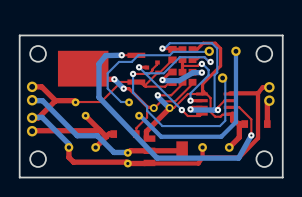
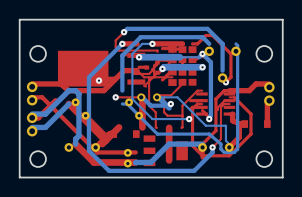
top track: none -> (124, 32) (115, 40) (115, 47) (119, 50) (157, 51)
bottom track: none -> (124, 32) (127, 28) (207, 28) (222, 43) (222, 70)
via: none -> (124, 32)
board edge: (282, 35) (19, 35) -> (282, 35) (282, 19) (19, 19) (19, 35)
bottom track: none -> (122, 43) (88, 77) (88, 150) (109, 170) (194, 170) (212, 152) (212, 147)
via: none -> (122, 43)
top track: none -> (137, 43) (122, 43)
top track: none -> (152, 43) (182, 44)
bottom track: none -> (152, 43) (142, 43) (132, 53) (132, 99) (152, 119) (189, 119)
via: none -> (152, 43)
bottom track: none -> (209, 43) (202, 37) (140, 37) (122, 55) (122, 90)
bottom track: none -> (235, 43) (237, 45) (237, 149) (234, 152) (224, 152) (220, 149) (220, 144) (209, 134) (157, 134) (127, 104) (122, 104)
top track: none -> (192, 44) (197, 43) (205, 35) (212, 35) (230, 53) (230, 77) (225, 82)
bottom track: (162, 48) (169, 43) (211, 43) (217, 48) (217, 72) (214, 75) (214, 110) -> none
via: (162, 48) -> none
top track: (192, 49) (197, 49) (203, 43) (215, 43) (220, 48) (220, 65) (202, 83) (202, 93) (187, 93) (173, 108) (169, 108) (146, 131) (146, 138) (149, 138) -> none
bottom track: (209, 51) (173, 51) (169, 55) (138, 55) (131, 61) (119, 61) (107, 73) (107, 88) (121, 102) (129, 102) -> none
bottom track: (235, 51) (235, 122) (221, 136) (161, 136) (139, 115) -> none
via: none -> (202, 53)
top track: none -> (172, 54) (167, 60) (159, 60) (154, 65) (154, 77)
bottom track: (121, 55) (105, 55) (98, 63) (98, 97) (157, 158) (238, 158) (251, 135) -> none
via: (121, 55) -> none
via: none -> (139, 57)
bottom track: (179, 57) (163, 73) (145, 73) -> (179, 57) (139, 57)
bottom track: (199, 57) (204, 57) (210, 61) -> (199, 57) (202, 53) (210, 62) (210, 115) (209, 119)
via: (210, 61) -> none
top track: (201, 63) (197, 65) (182, 65) -> none
bottom track: (201, 63) (208, 69) (208, 75) (190, 93) (190, 100) -> none
via: (201, 63) -> none
bottom track: (139, 67) (181, 110) -> none
via: (139, 67) -> none
bottom track: none -> (202, 67) (164, 67) (162, 68)
via: none -> (202, 67)
via: none -> (162, 68)
bottom track: (201, 72) (193, 72) (179, 80) (162, 79) -> none
via: (201, 72) -> none
bottom track: (133, 73) (133, 92) (162, 126) (219, 126) (225, 120) (225, 81) (222, 78) -> none
via: (133, 73) -> none
top track: none -> (149, 77) (149, 105) (155, 112) (156, 127)
top track: none -> (172, 77) (144, 77) (137, 70) (124, 70) (104, 90) (68, 90) (60, 83) (32, 83)
bottom track: (114, 79) (123, 88) -> none
via: (114, 79) -> none
via: (162, 79) -> none
via: none -> (98, 80)
top track: (172, 82) (169, 82) (165, 86) (145, 86) (139, 82) (121, 81) (100, 102) (55, 100) (41, 86) (32, 86) -> none
top track: (192, 82) (175, 101) (161, 101) (154, 108) (147, 107) -> none
via: none -> (225, 82)
top track: none -> (269, 83) (256, 83) (249, 90) (224, 90) (215, 99) (215, 130) (202, 144)
top track: (269, 87) (262, 87) (258, 93) -> none
top track: (123, 88) (129, 88) (147, 107) -> none
via: (123, 88) -> none
top track: none -> (202, 90) (197, 90) (182, 105) (181, 127)
top track: (202, 91) (210, 98) (210, 112) (215, 116) (229, 114) -> none
top track: (258, 93) (224, 93) -> none
top track: (258, 93) (258, 138) (239, 157) (202, 157) (198, 163) (149, 162) -> none
via: (157, 95) -> none
top track: none -> (32, 96) (42, 97) (97, 152) (135, 152)
top track: none -> (115, 97) (142, 97) (143, 127)
via: none -> (115, 97)
bottom track: none -> (141, 97) (150, 105) (169, 105) (170, 104)
bottom track: none -> (157, 97) (177, 97) (205, 125) (225, 125) (225, 140) (229, 144)
top track: none -> (164, 97) (164, 112) (167, 115) (182, 115)
top track: none -> (229, 97) (234, 97) (251, 114) (251, 134) (229, 155) (202, 155) (192, 145) (192, 109) (197, 104) (202, 104)
bottom track: (32, 100) (42, 100) (77, 135) (97, 135) (114, 152) (127, 152) -> none
via: (190, 100) -> none
top track: none -> (68, 104) (105, 140)
bottom track: none -> (68, 104) (45, 127) (32, 127)
via: none -> (170, 104)
top track: none -> (229, 104) (224, 104) (220, 107) (220, 139) (212, 147)
top track: (147, 107) (147, 117) (136, 128) (136, 134) -> none
top track: (229, 107) (239, 107) (251, 119) (251, 135) -> none
part position: (161, 108) -> (149, 97)
bottom track: (190, 109) (217, 110) -> none
via: (190, 109) -> none
top track: (181, 110) (187, 116) (199, 116) (201, 114) -> none
via: (181, 110) -> none
top track: none -> (202, 110) (209, 119)
via: (217, 110) -> none
bottom track: none -> (32, 114) (45, 114) (68, 90) (75, 90) (78, 93) (78, 135) (75, 139) (75, 144)
bottom track: (32, 117) (42, 117) (68, 144) (68, 147) -> none
via: none -> (189, 119)
via: none -> (209, 119)
top track: none -> (120, 127) (102, 144)
top track: none -> (169, 127) (169, 160)
top track: (99, 130) (32, 131) -> none
via: (251, 135) -> none
top track: none -> (75, 144) (93, 162) (135, 162)
bottom track: none -> (202, 144) (169, 144) (150, 162) (135, 162)
top track: (68, 147) (68, 157) (73, 162) (149, 162) -> none
via: none -> (212, 147)
top track: (182, 150) (130, 150) (127, 152) -> none

